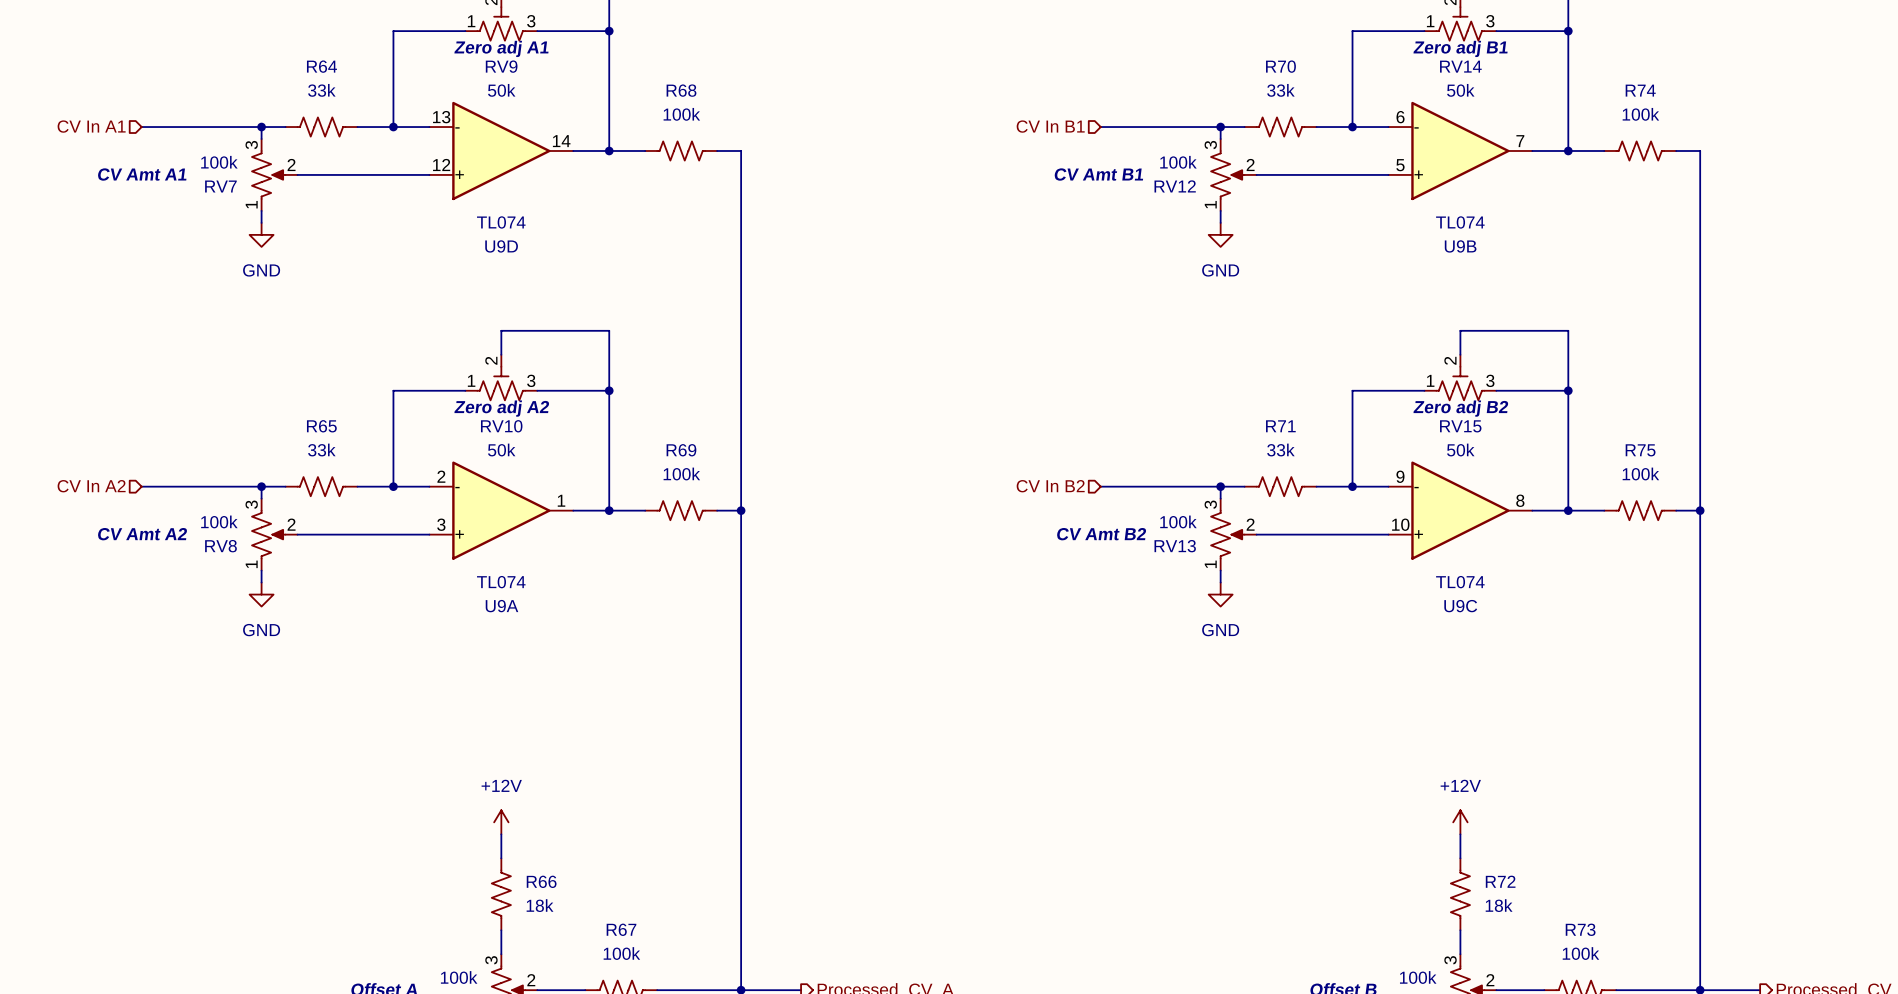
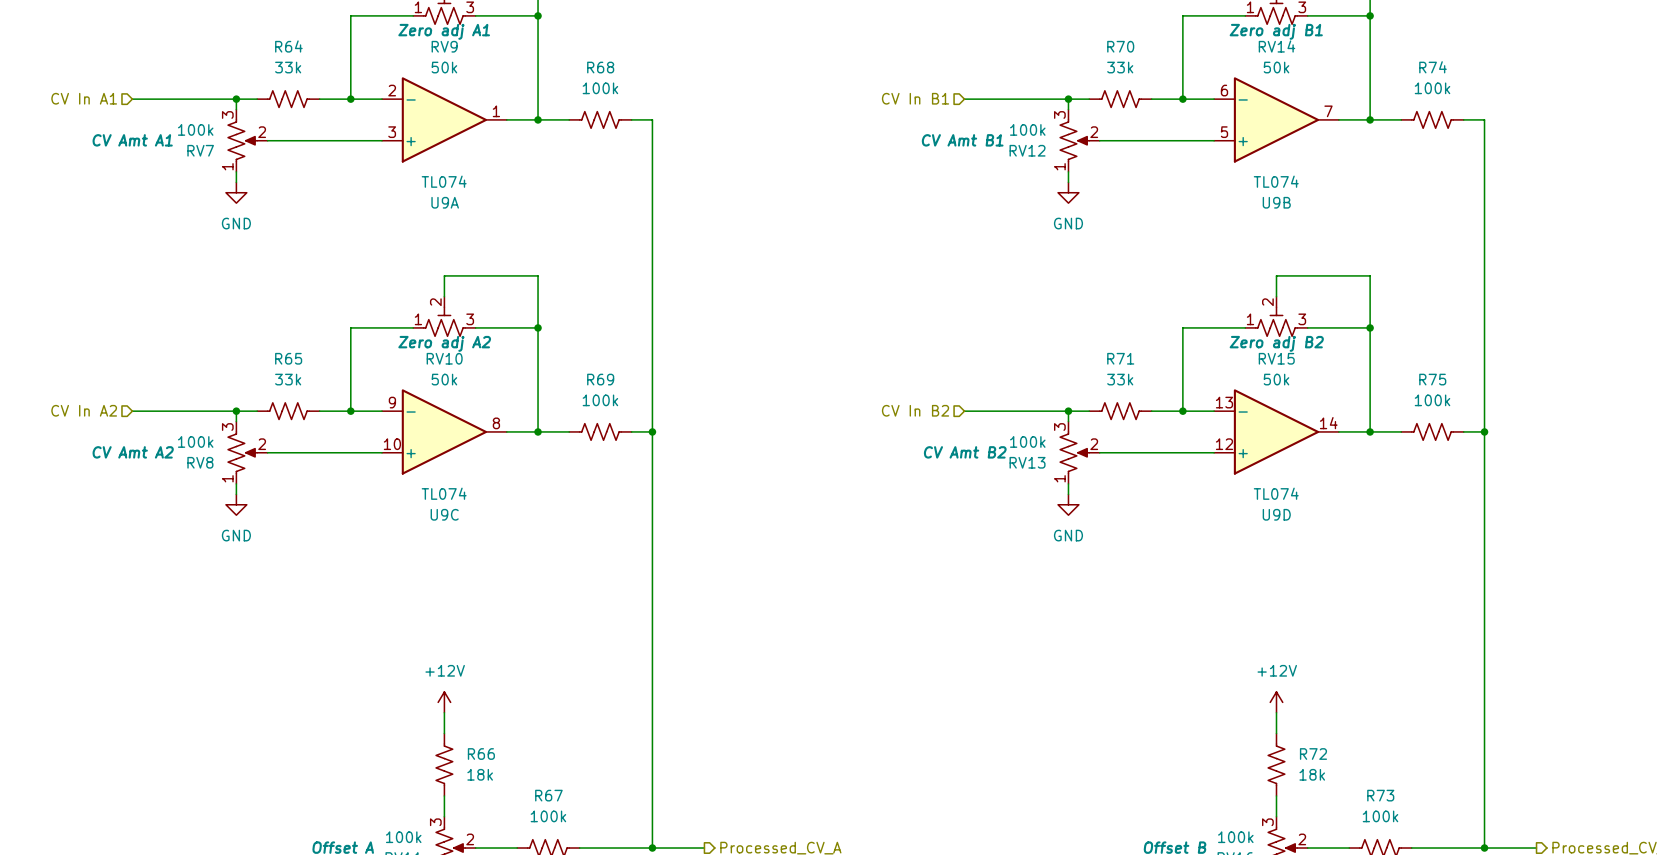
U9D position: (501, 150) -> (1276, 431)
U9A position: (501, 510) -> (444, 119)
U9C position: (1460, 510) -> (444, 431)

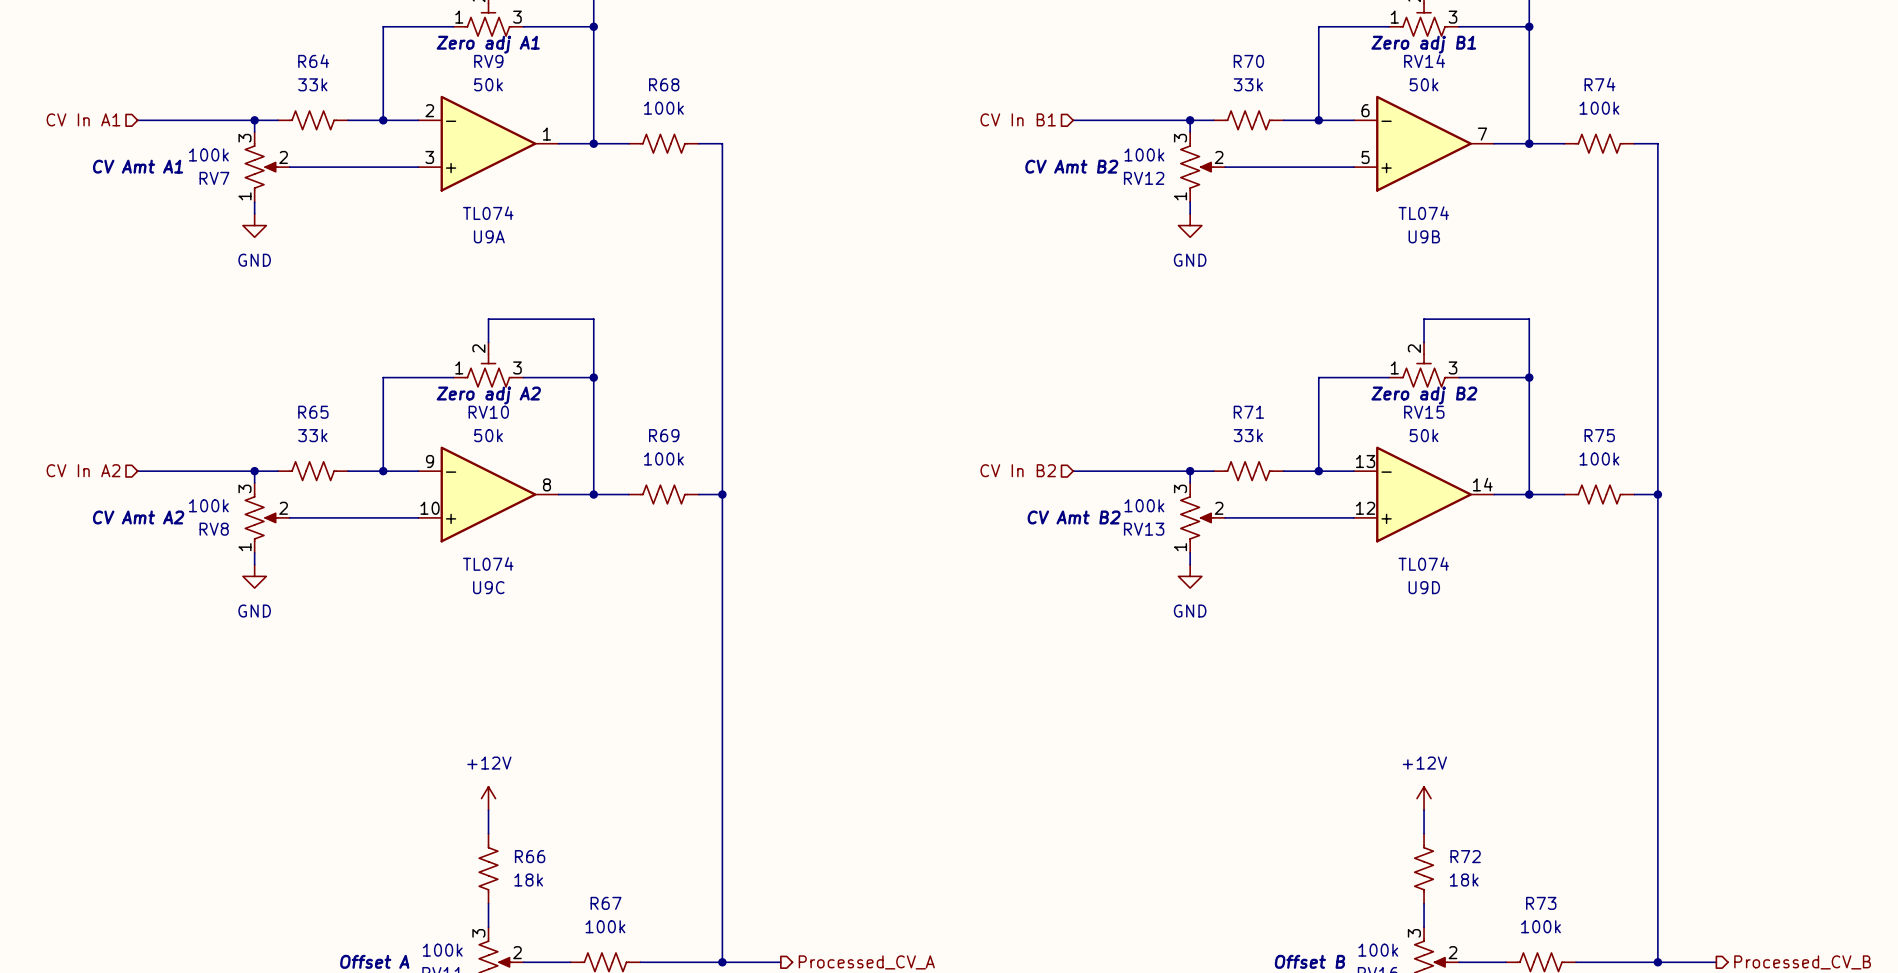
RV12 text: CV Amt B1 (962, 140) -> CV Amt B2 (1071, 166)

